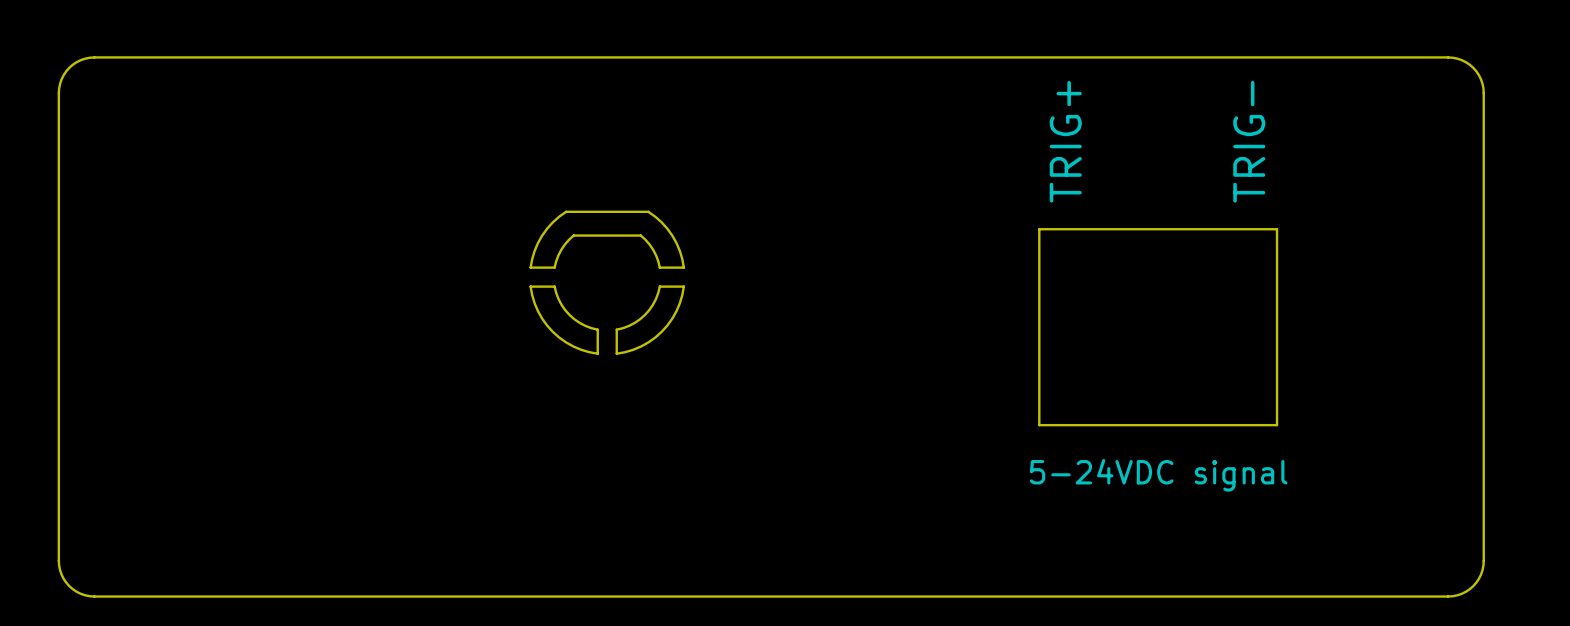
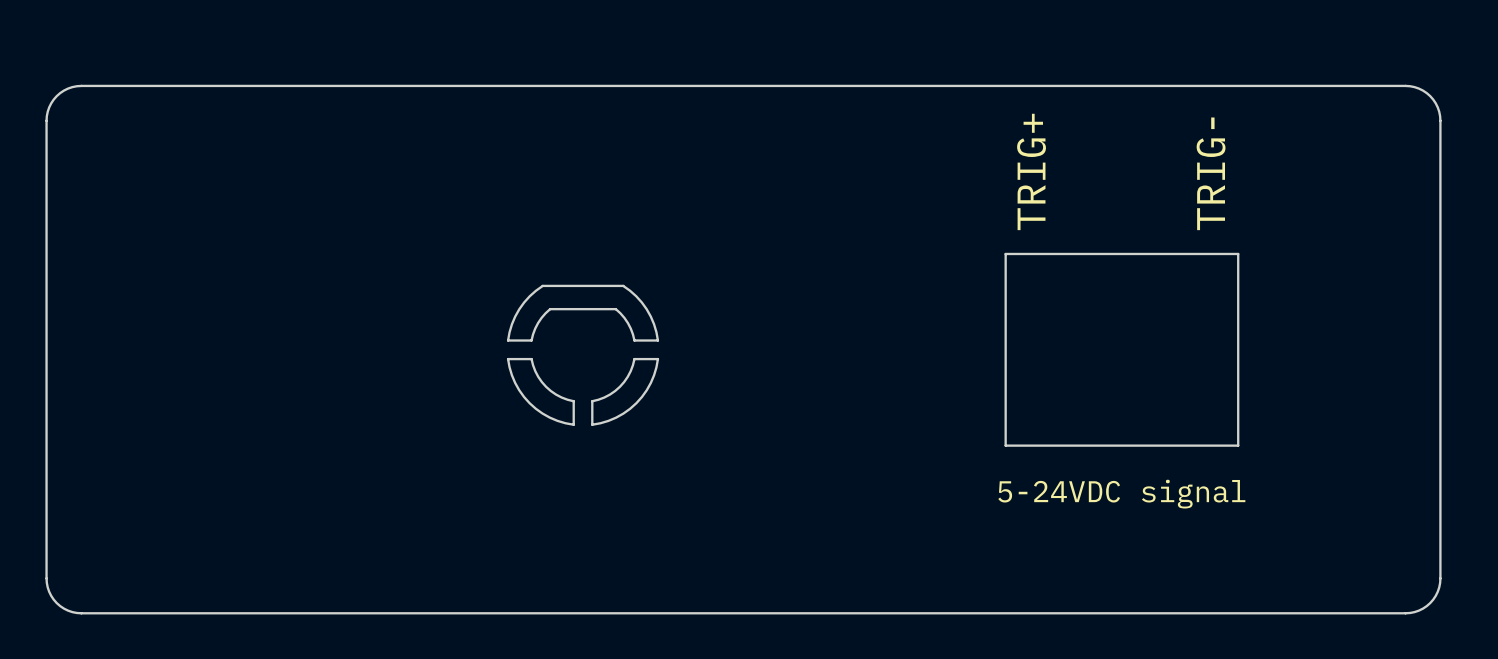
board edge: (566, 211) (648, 211) (661, 222) (672, 235) (679, 251) (683, 267) (659, 267) (653, 249) (640, 235) (573, 235) (561, 249) (554, 267) (530, 267) (534, 251) (542, 235) (552, 222) (566, 211) -> (542, 285) (623, 285) (636, 296) (646, 309) (654, 324) (657, 340) (634, 340) (627, 323) (615, 309) (550, 309) (538, 323) (531, 340) (508, 340) (511, 324) (519, 309) (529, 296) (542, 285)
board edge: (530, 286) (554, 286) (561, 304) (569, 314) (585, 325) (597, 329) (597, 353) (573, 346) (552, 331) (537, 310) (530, 286) -> (508, 359) (531, 359) (538, 376) (546, 386) (561, 397) (573, 401) (573, 424) (549, 417) (529, 403) (515, 382) (508, 359)
board edge: (659, 286) (683, 286) (679, 303) (672, 318) (661, 331) (648, 342) (633, 349) (616, 353) (616, 329) (634, 322) (645, 314) (656, 298) (659, 286) -> (634, 359) (657, 359) (654, 375) (646, 390) (636, 403) (623, 413) (608, 420) (592, 424) (592, 401) (604, 397) (619, 386) (630, 371) (634, 359)

